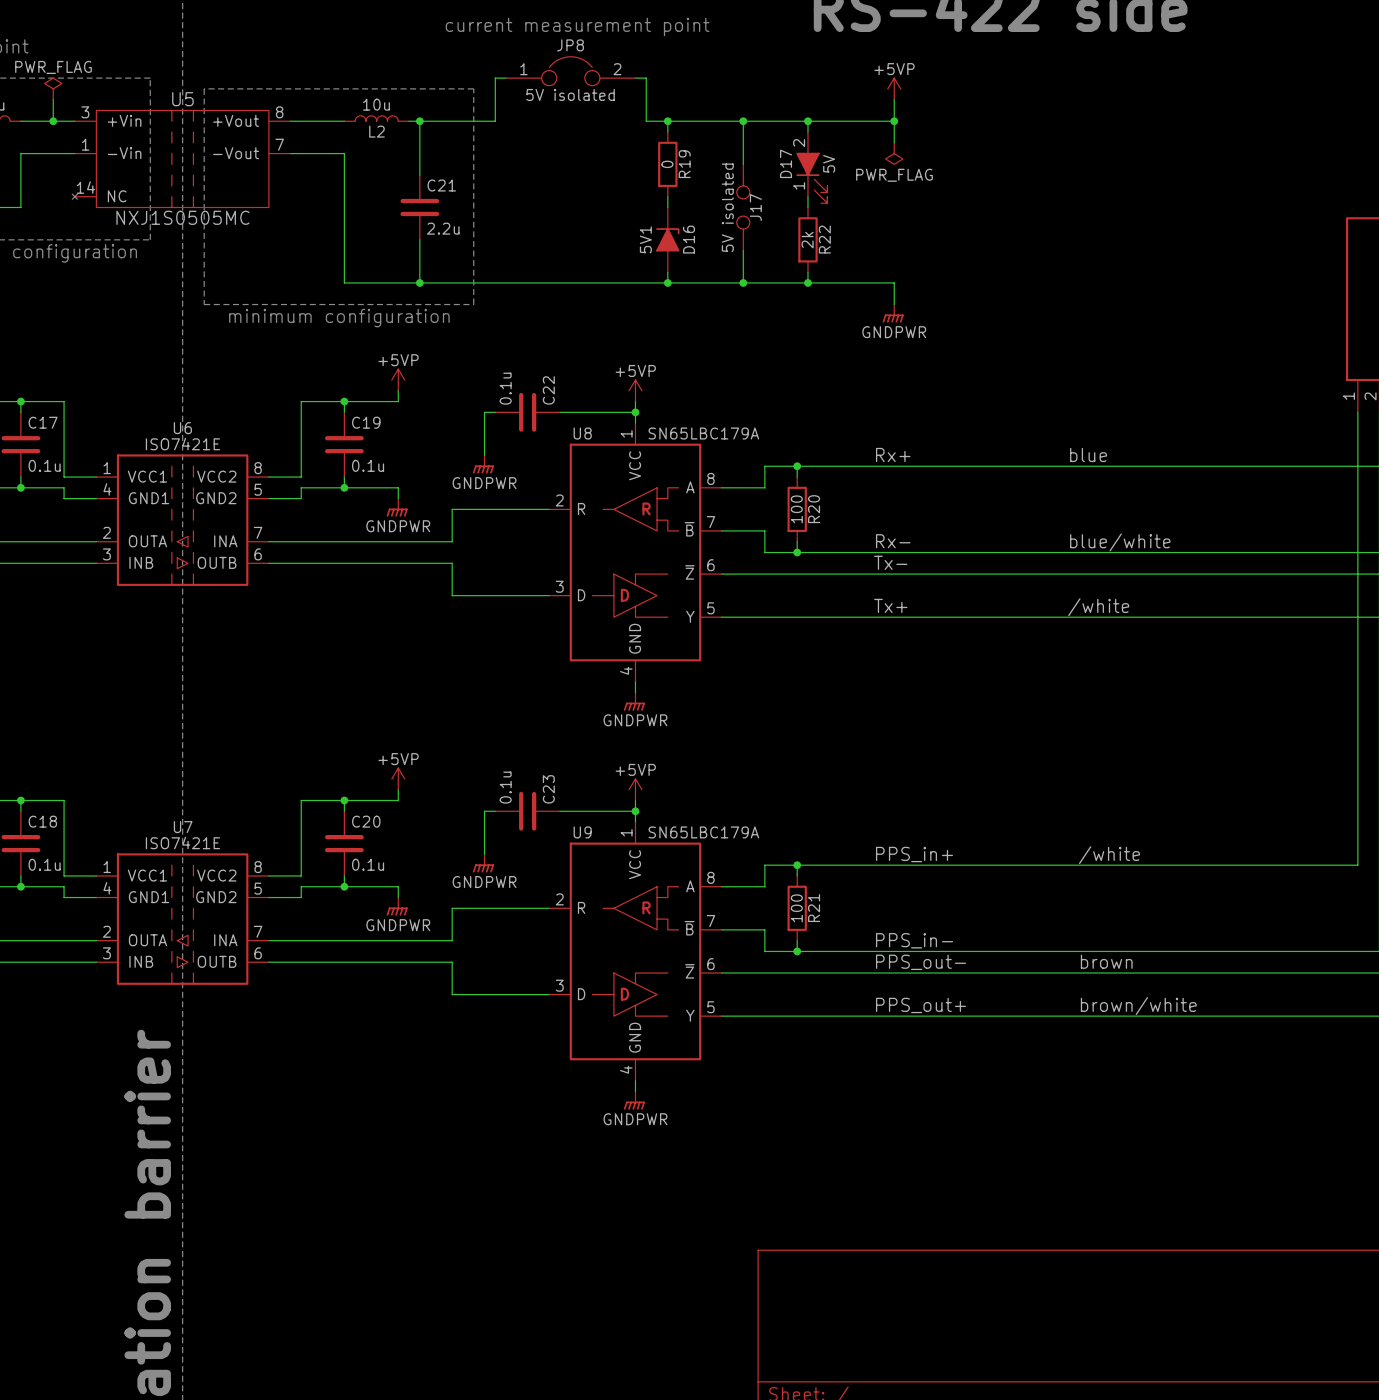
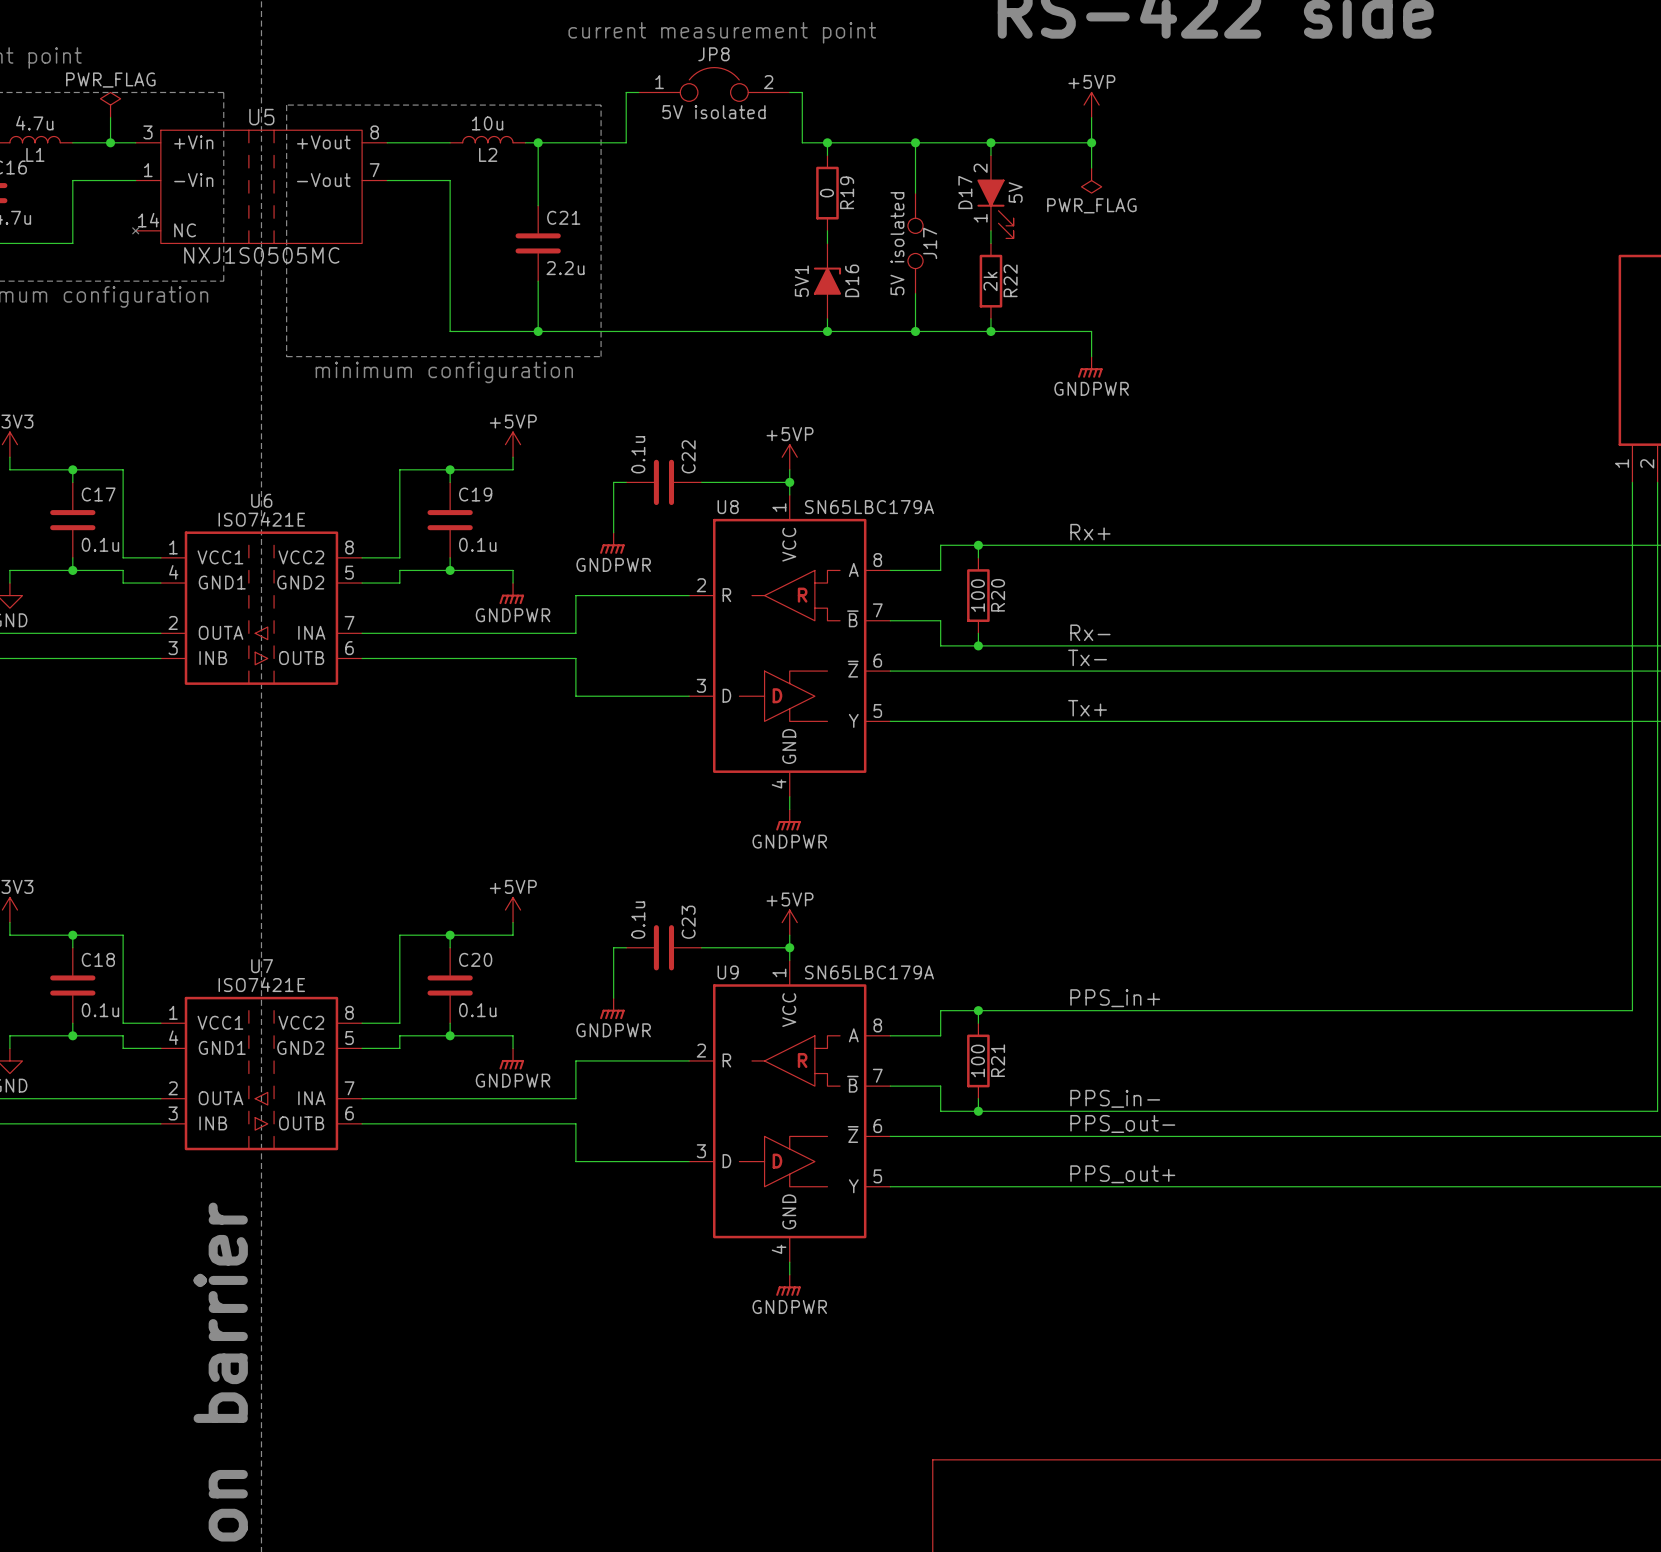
label: blue (1088, 454) -> none
label: blue/white (1120, 542) -> none
label: /white (1098, 607) -> none
label: /white (1109, 855) -> none
label: brown (1106, 961) -> none
label: brown/white (1138, 1006) -> none

